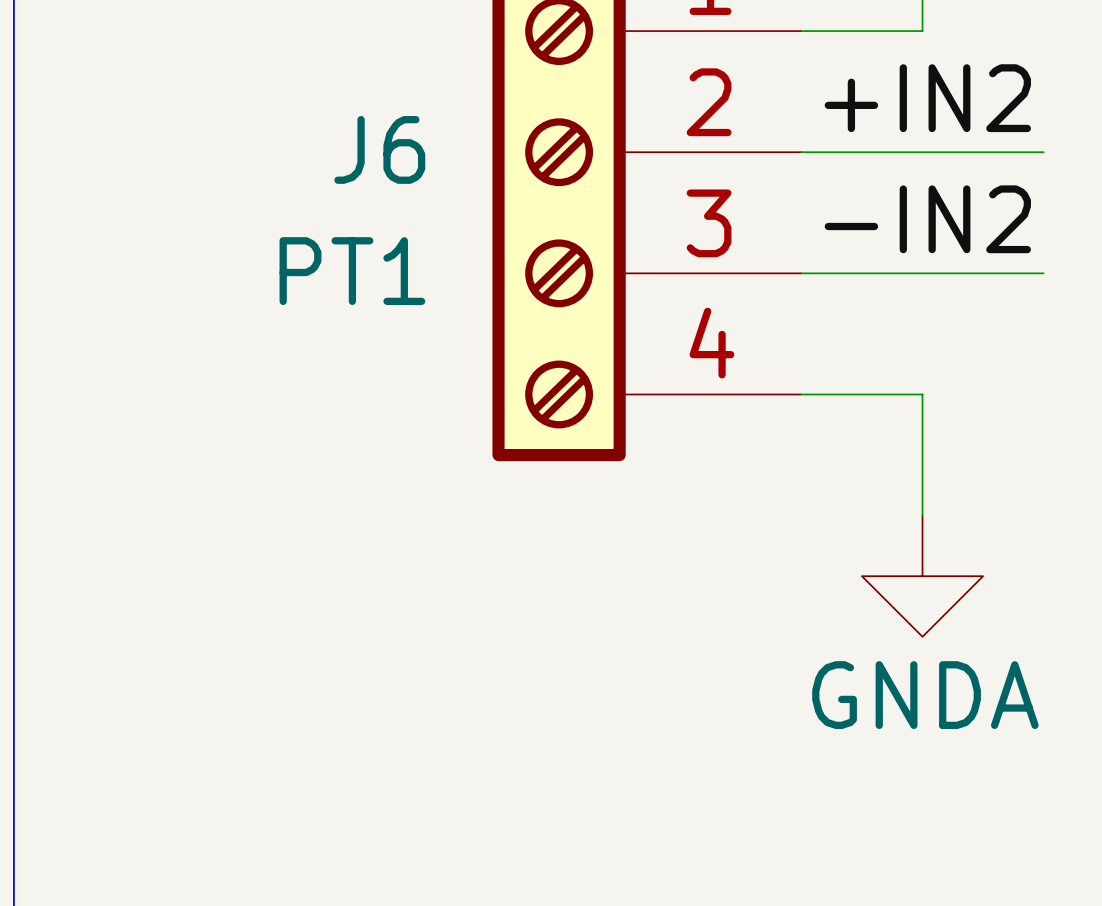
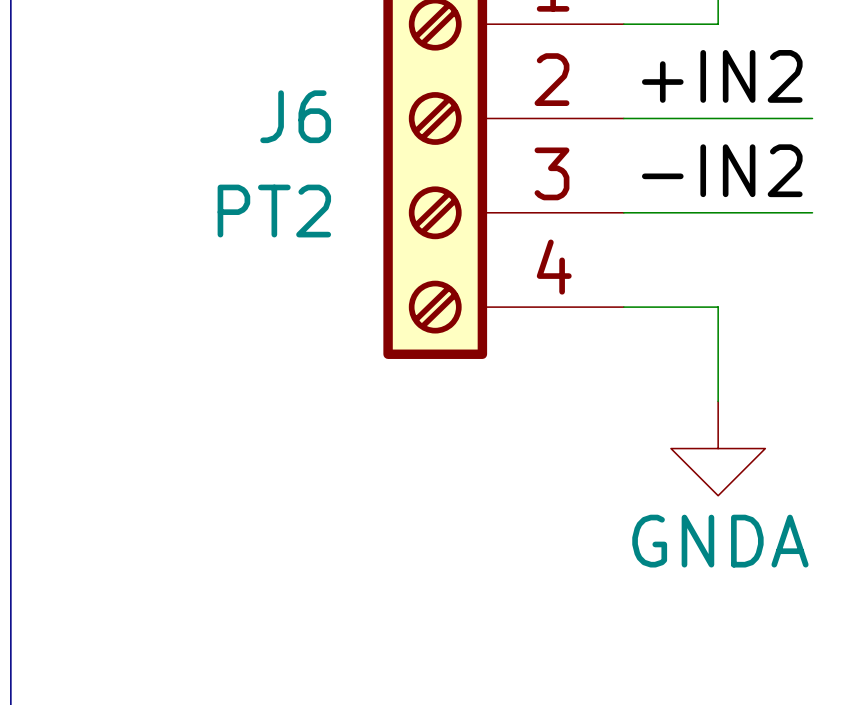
J6 value: PT1 (352, 271) -> PT2 (274, 211)

